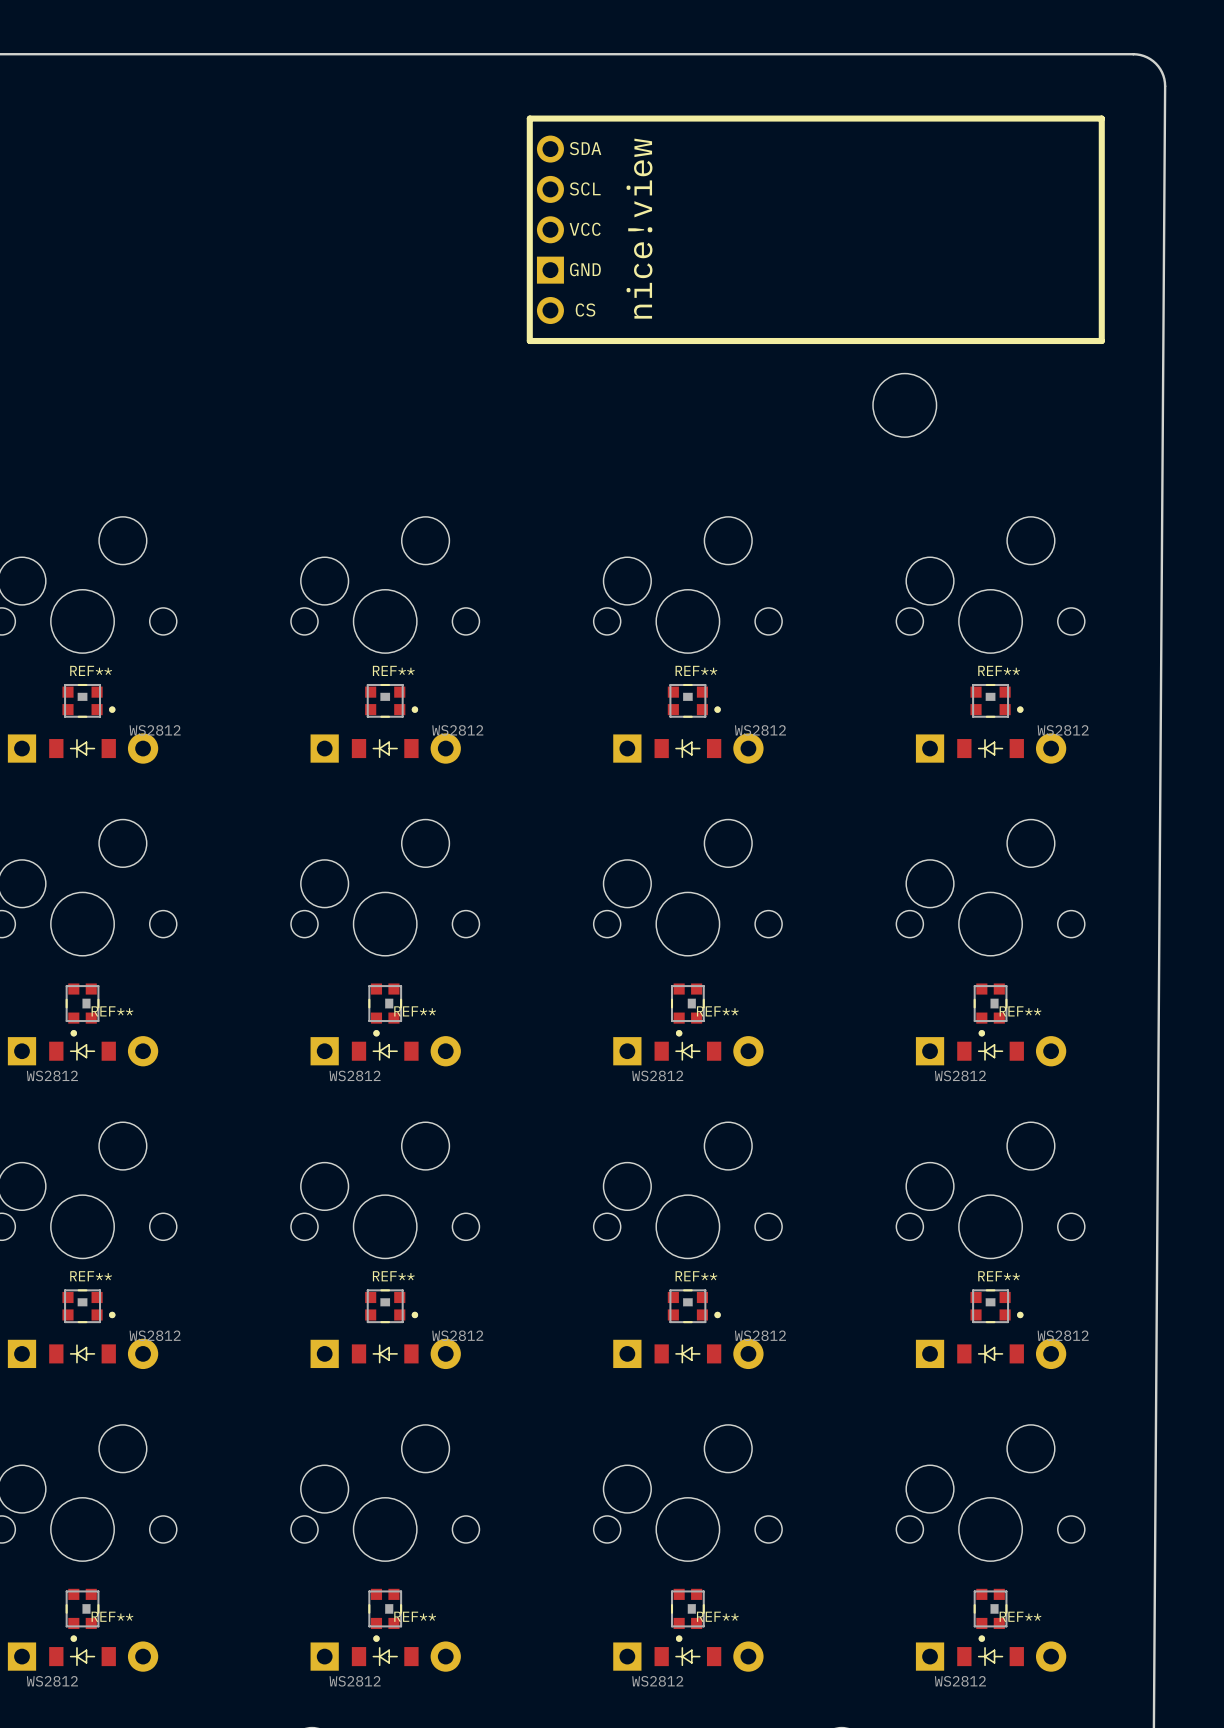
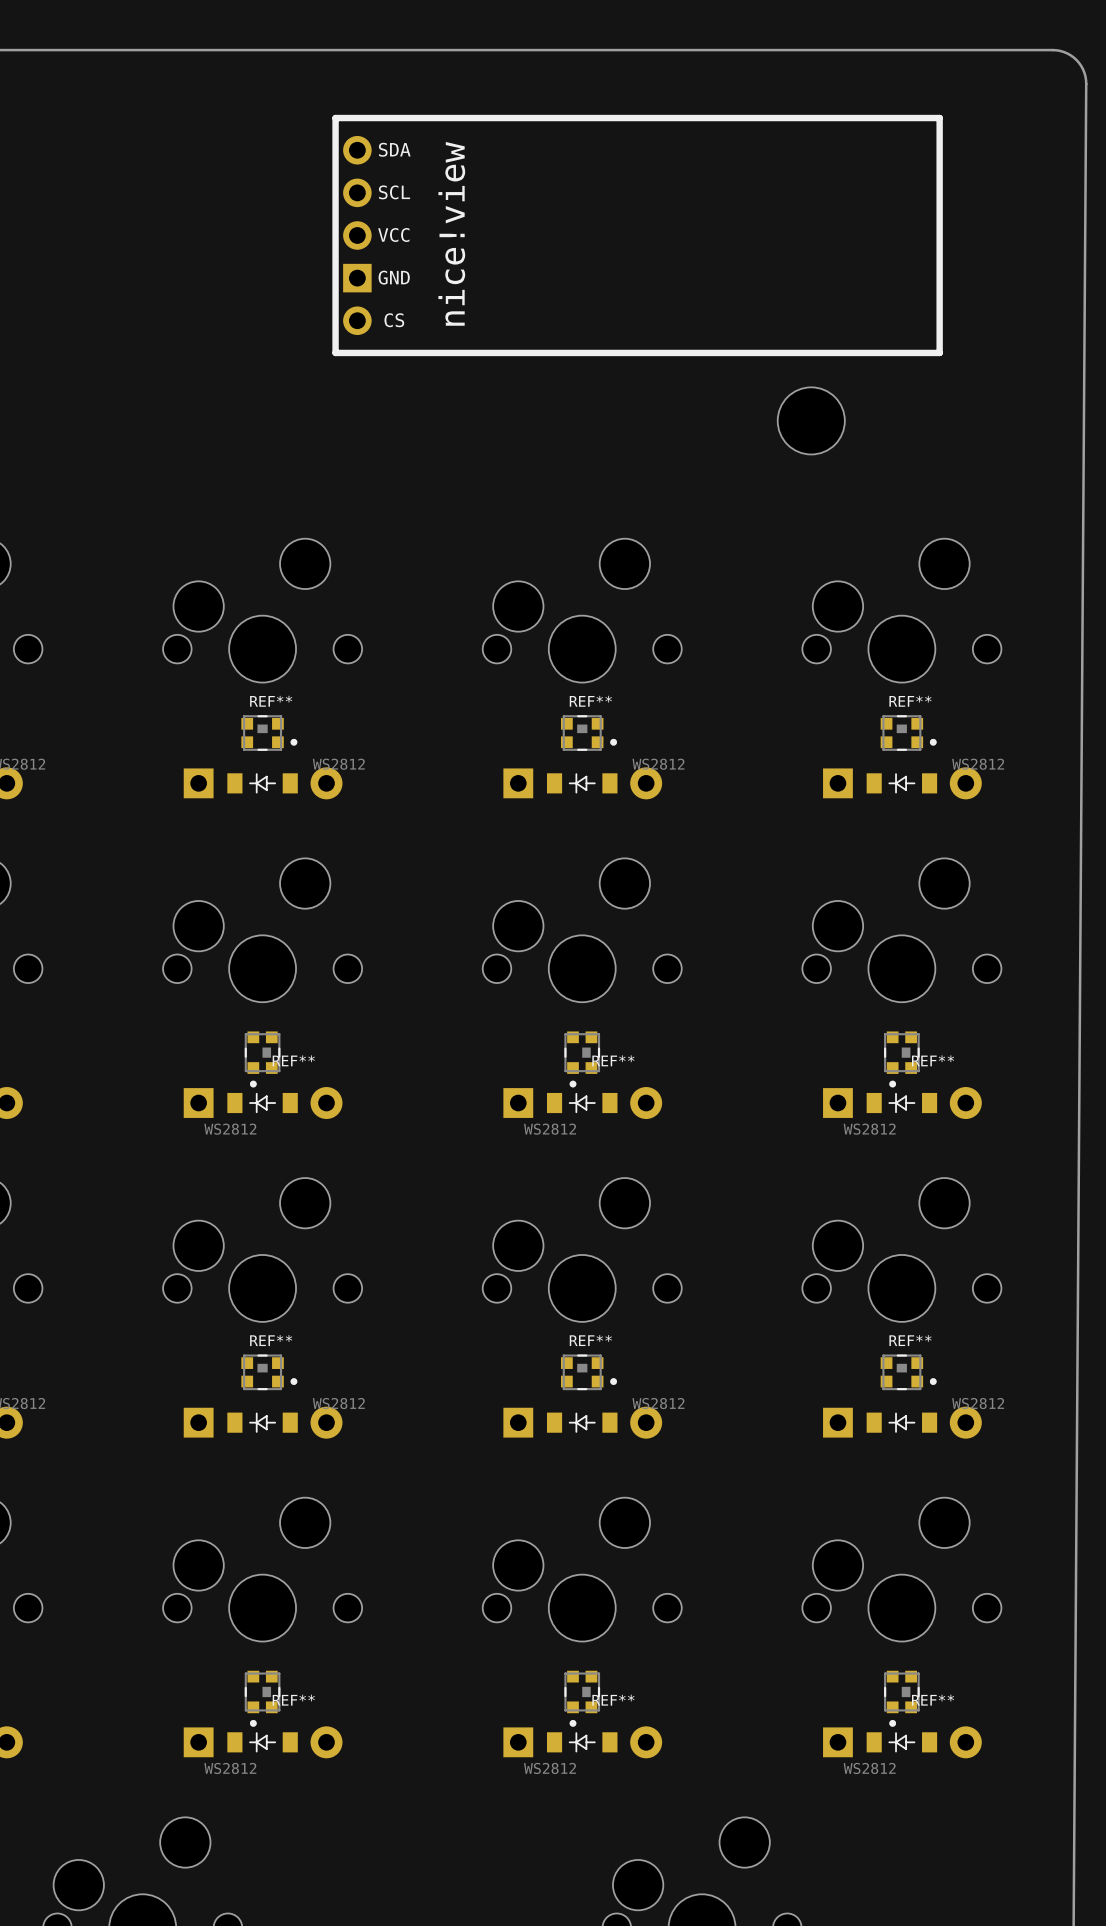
part position: (815, 229) -> (637, 235)

